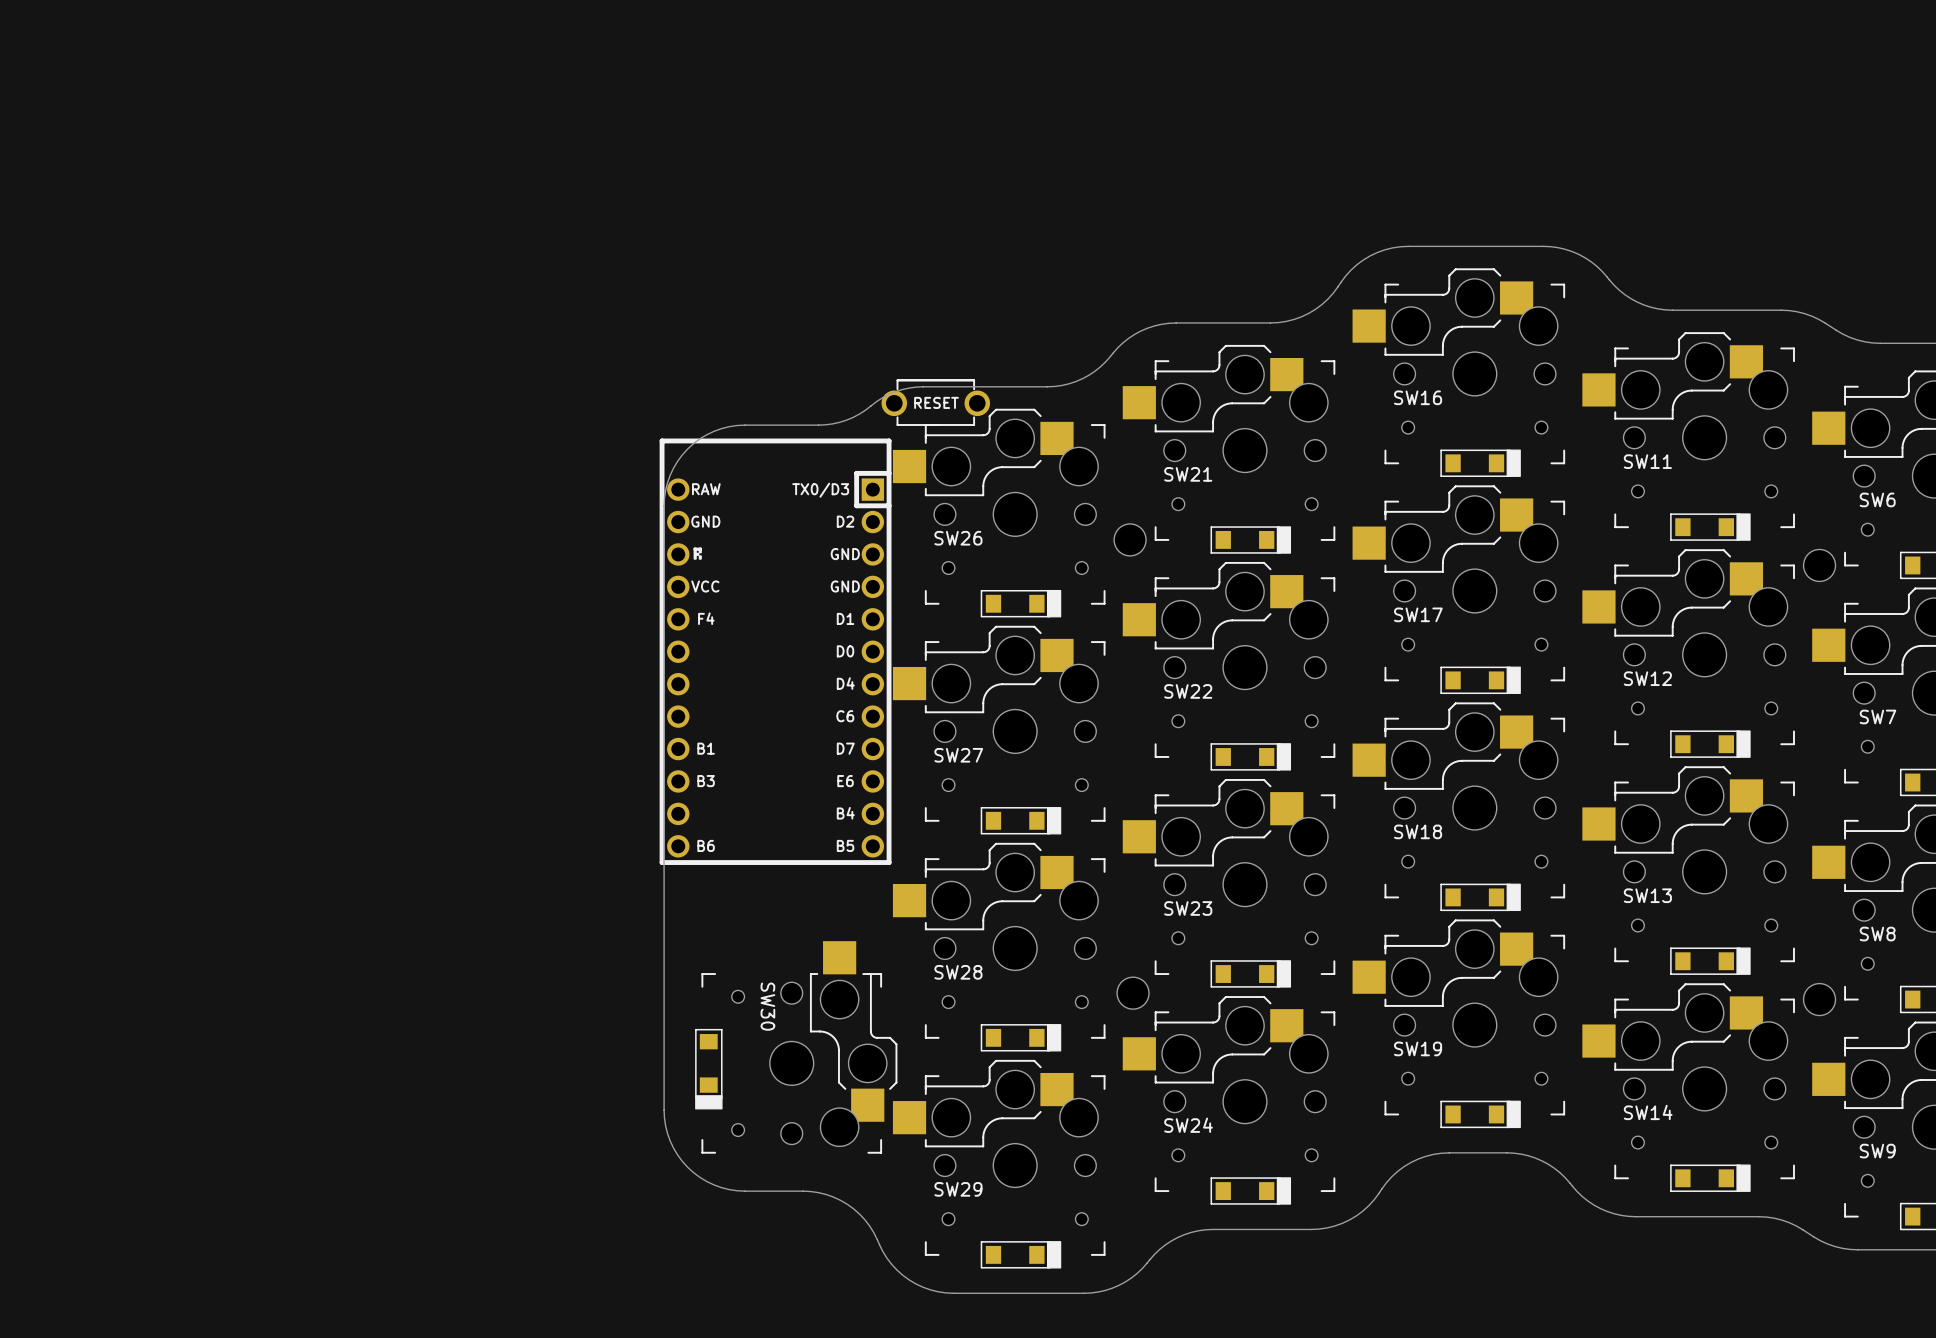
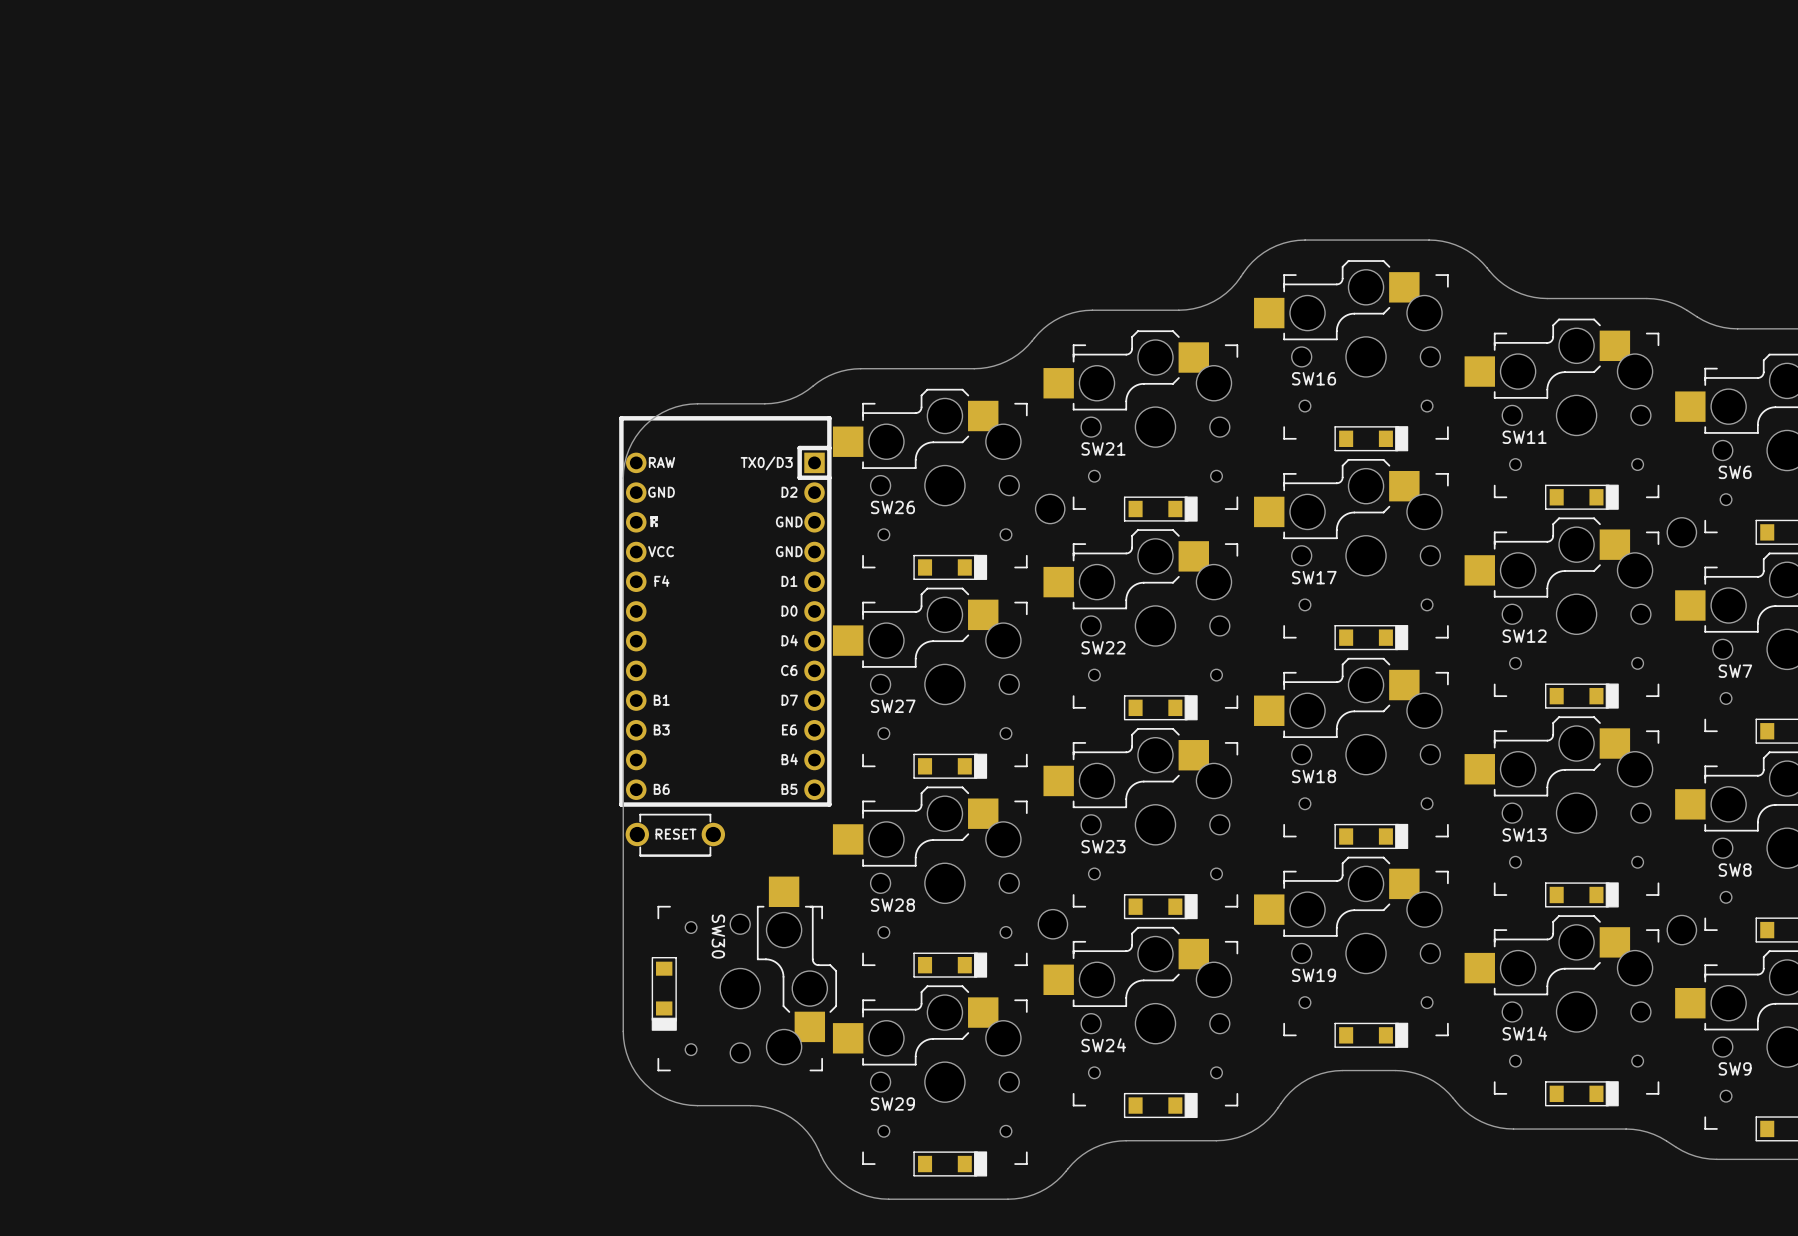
part: (935, 402) -> none
part: none -> (675, 835)

